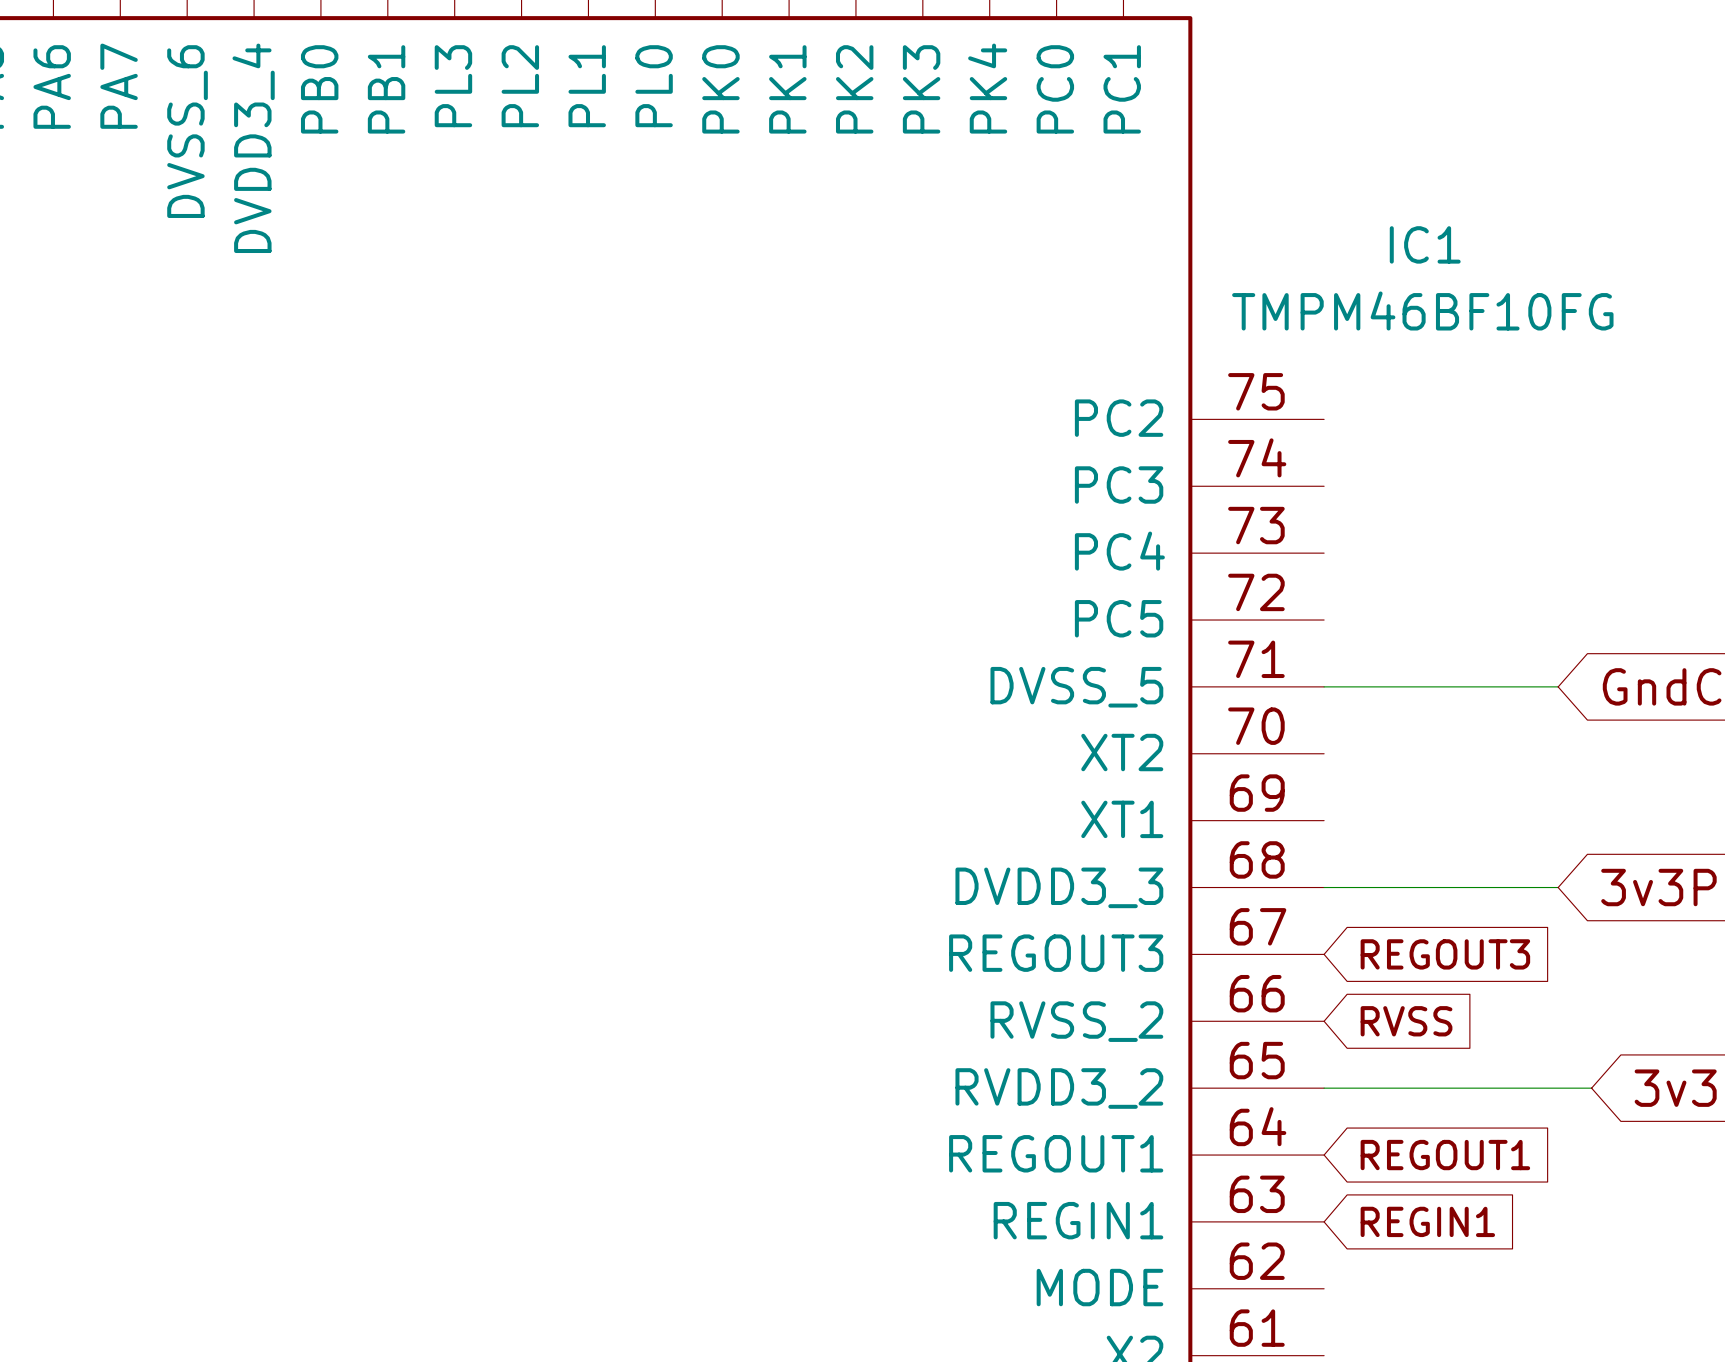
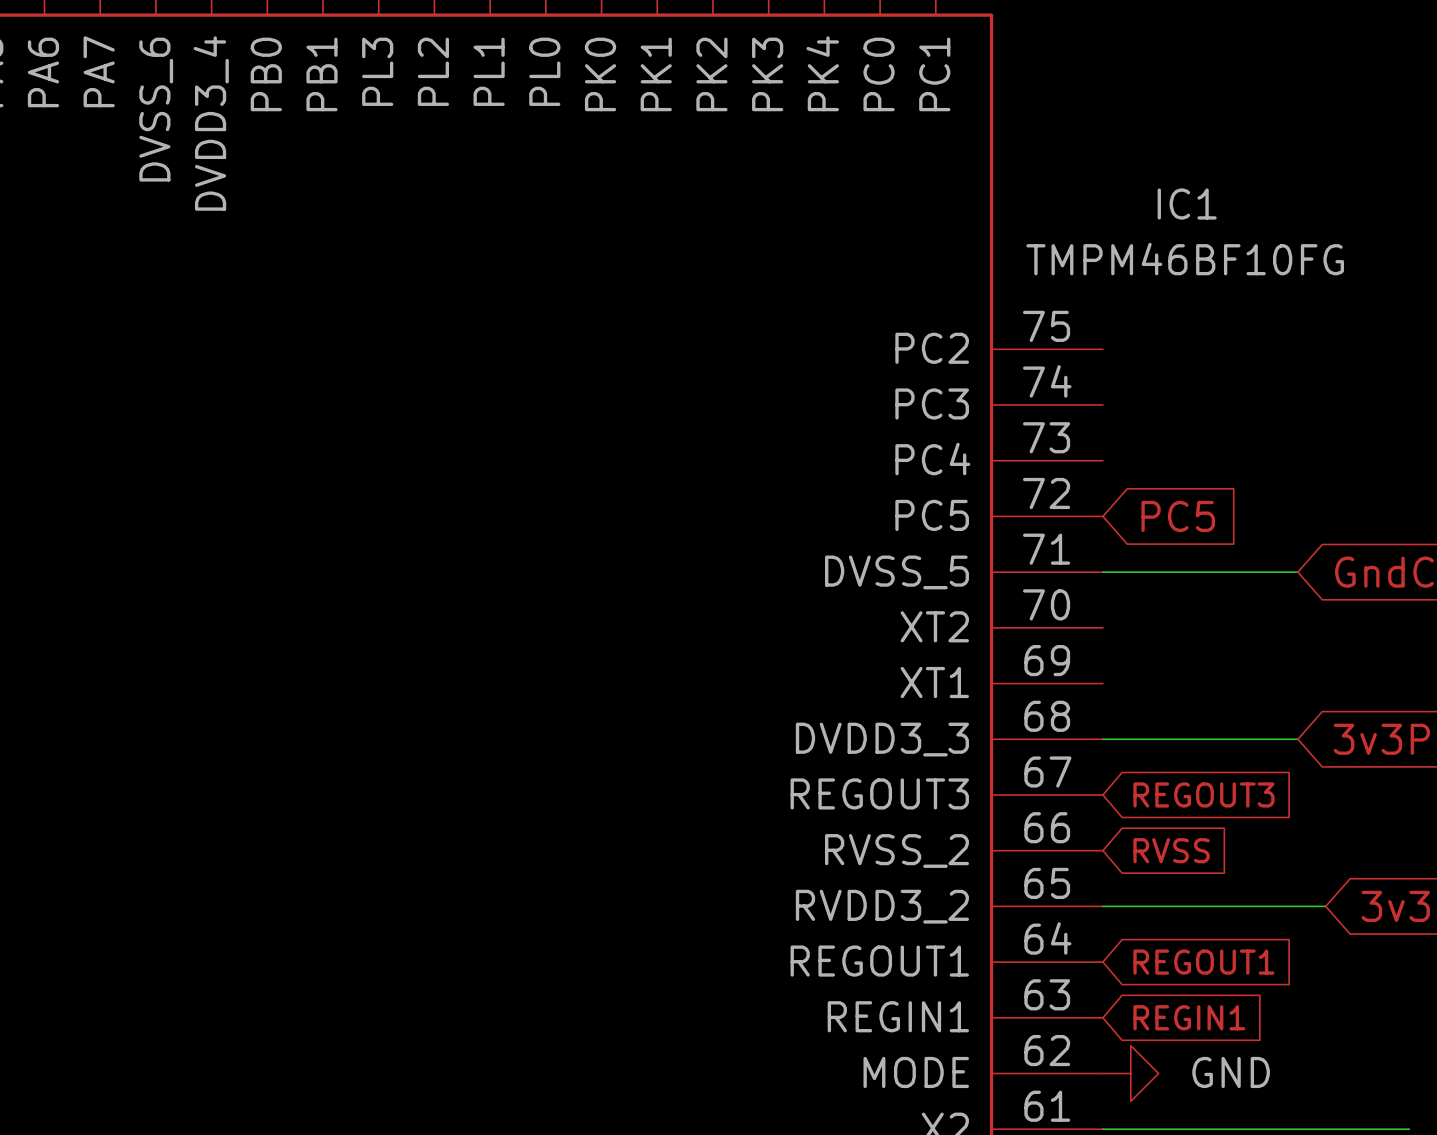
global label: none -> PC5 (1178, 516)
power symbol: none -> GND (1130, 1073)
wire: none -> (1102, 1129) (1409, 1129)

